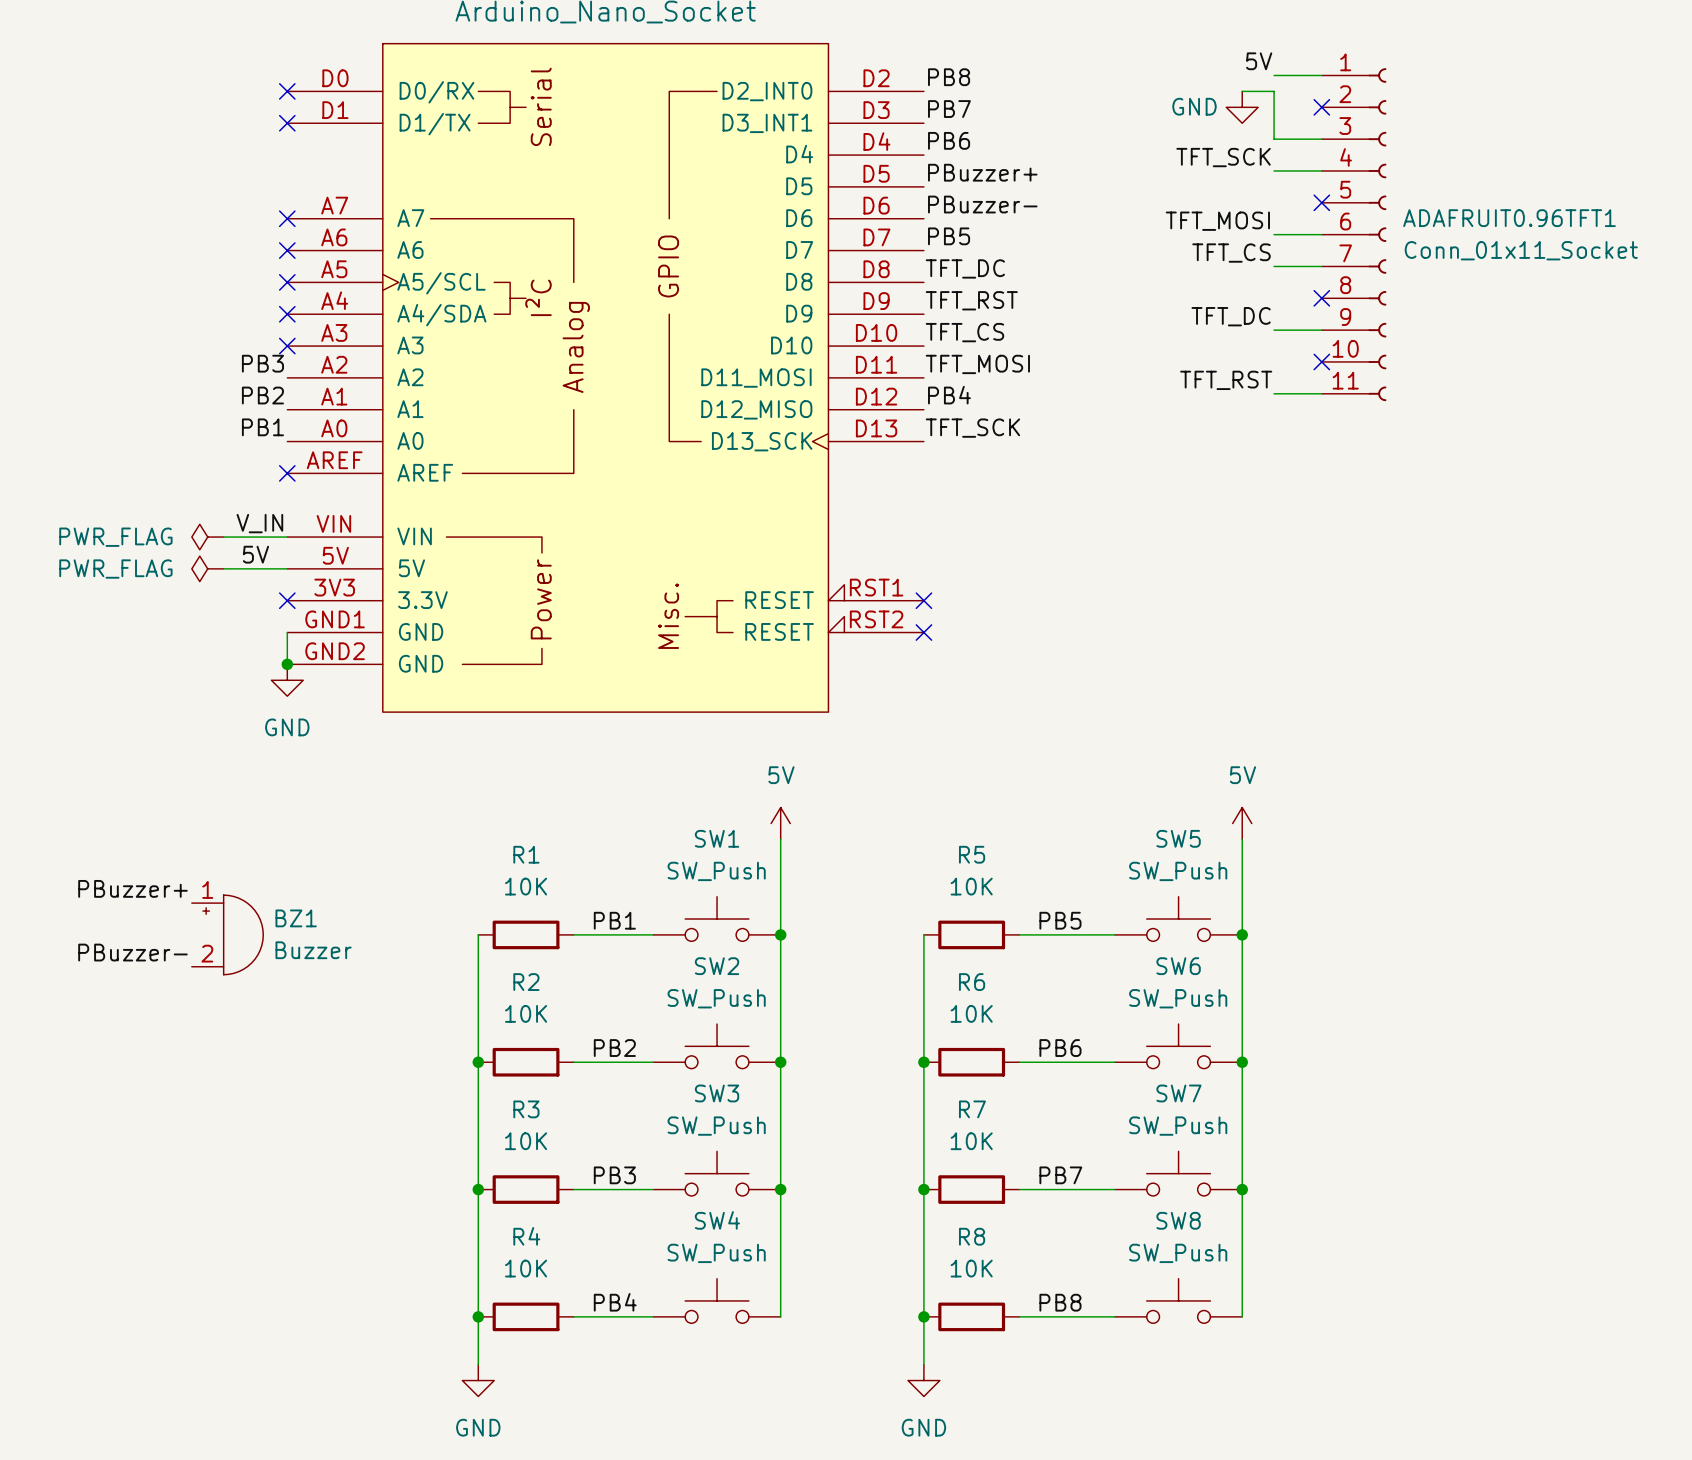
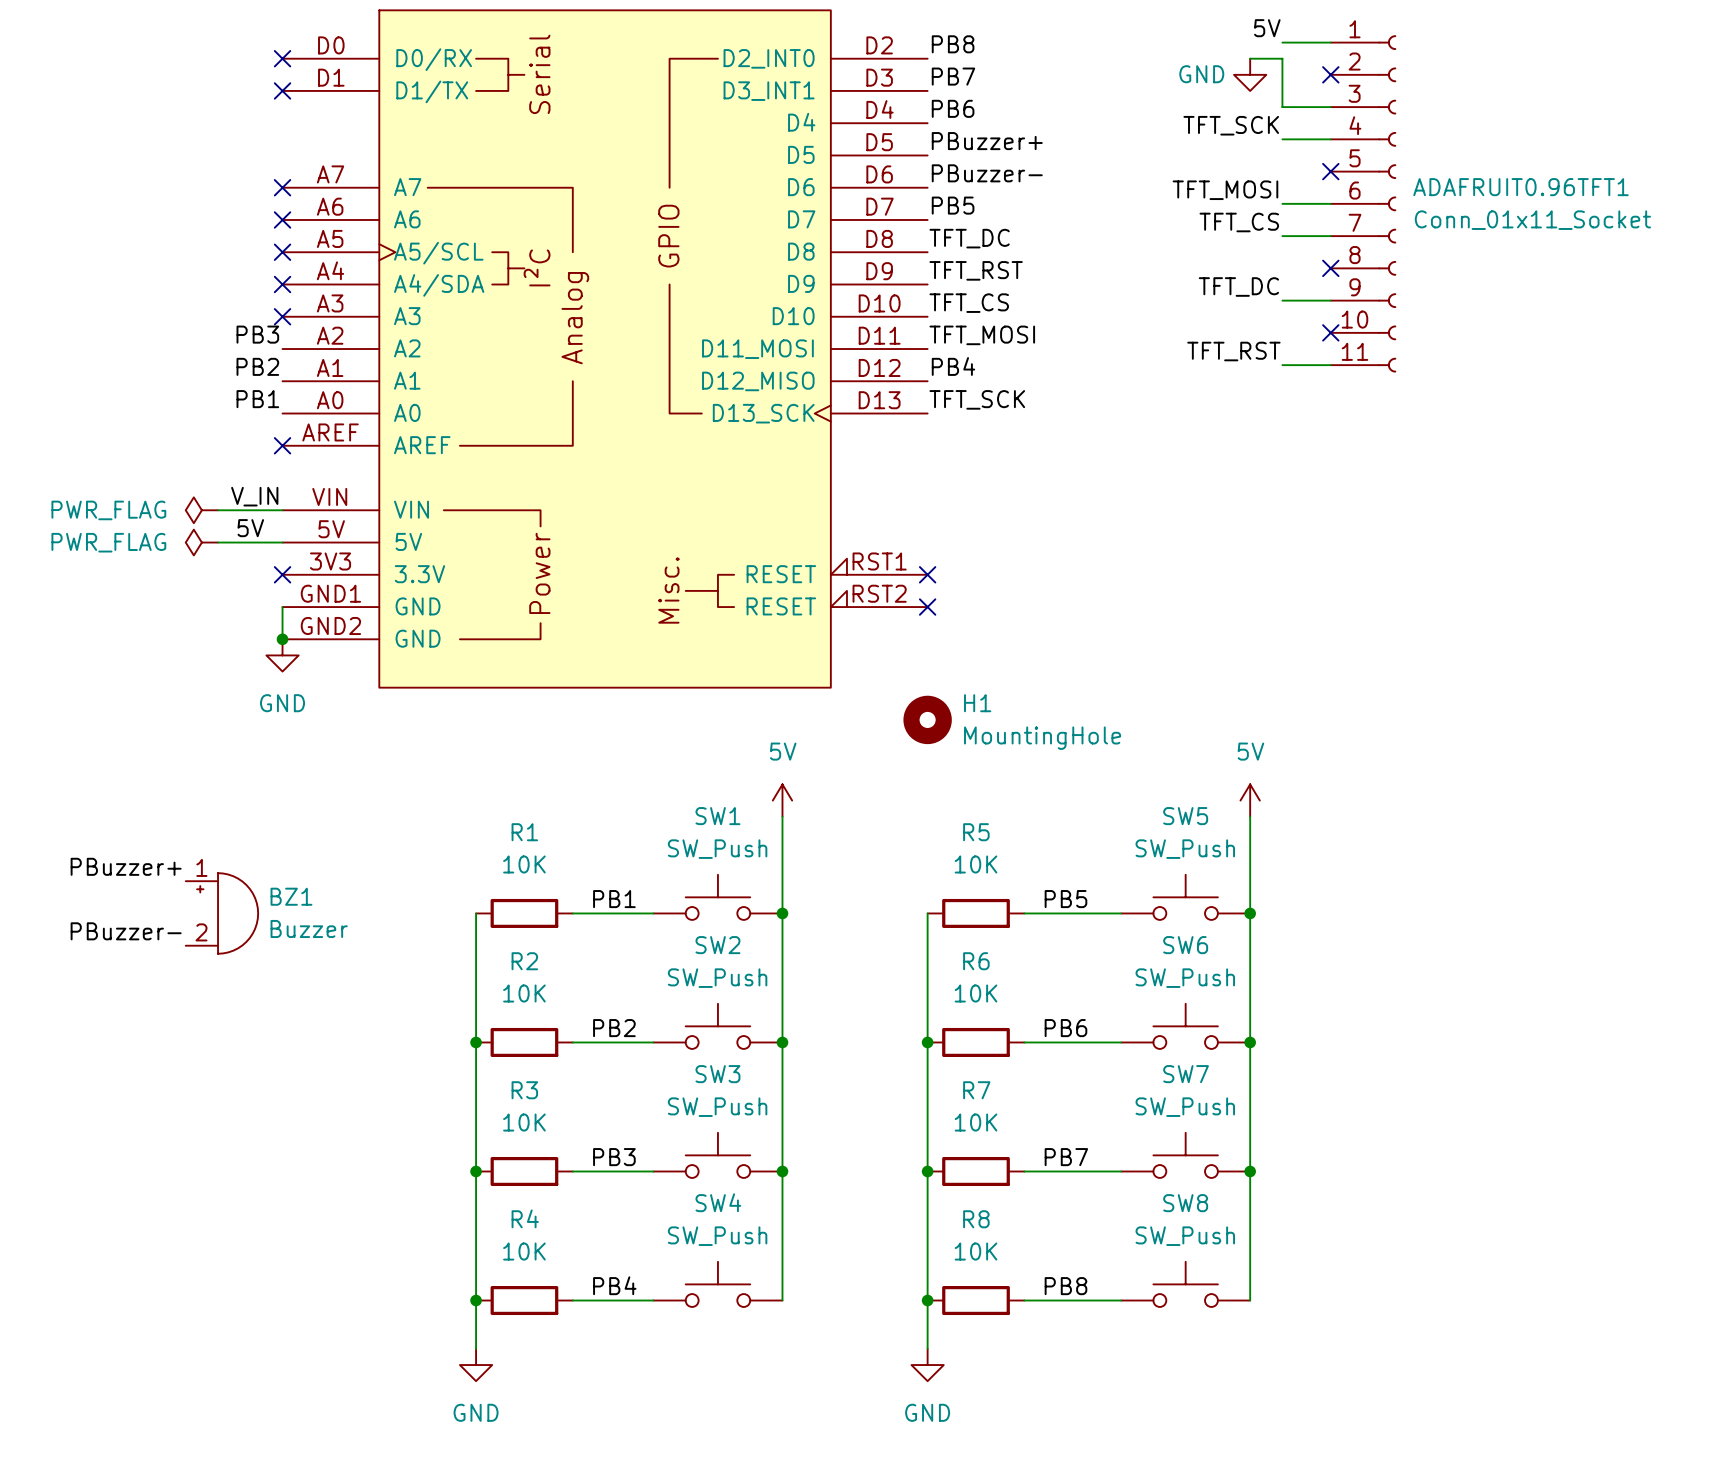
H1: none -> MountingHole (927, 719)

